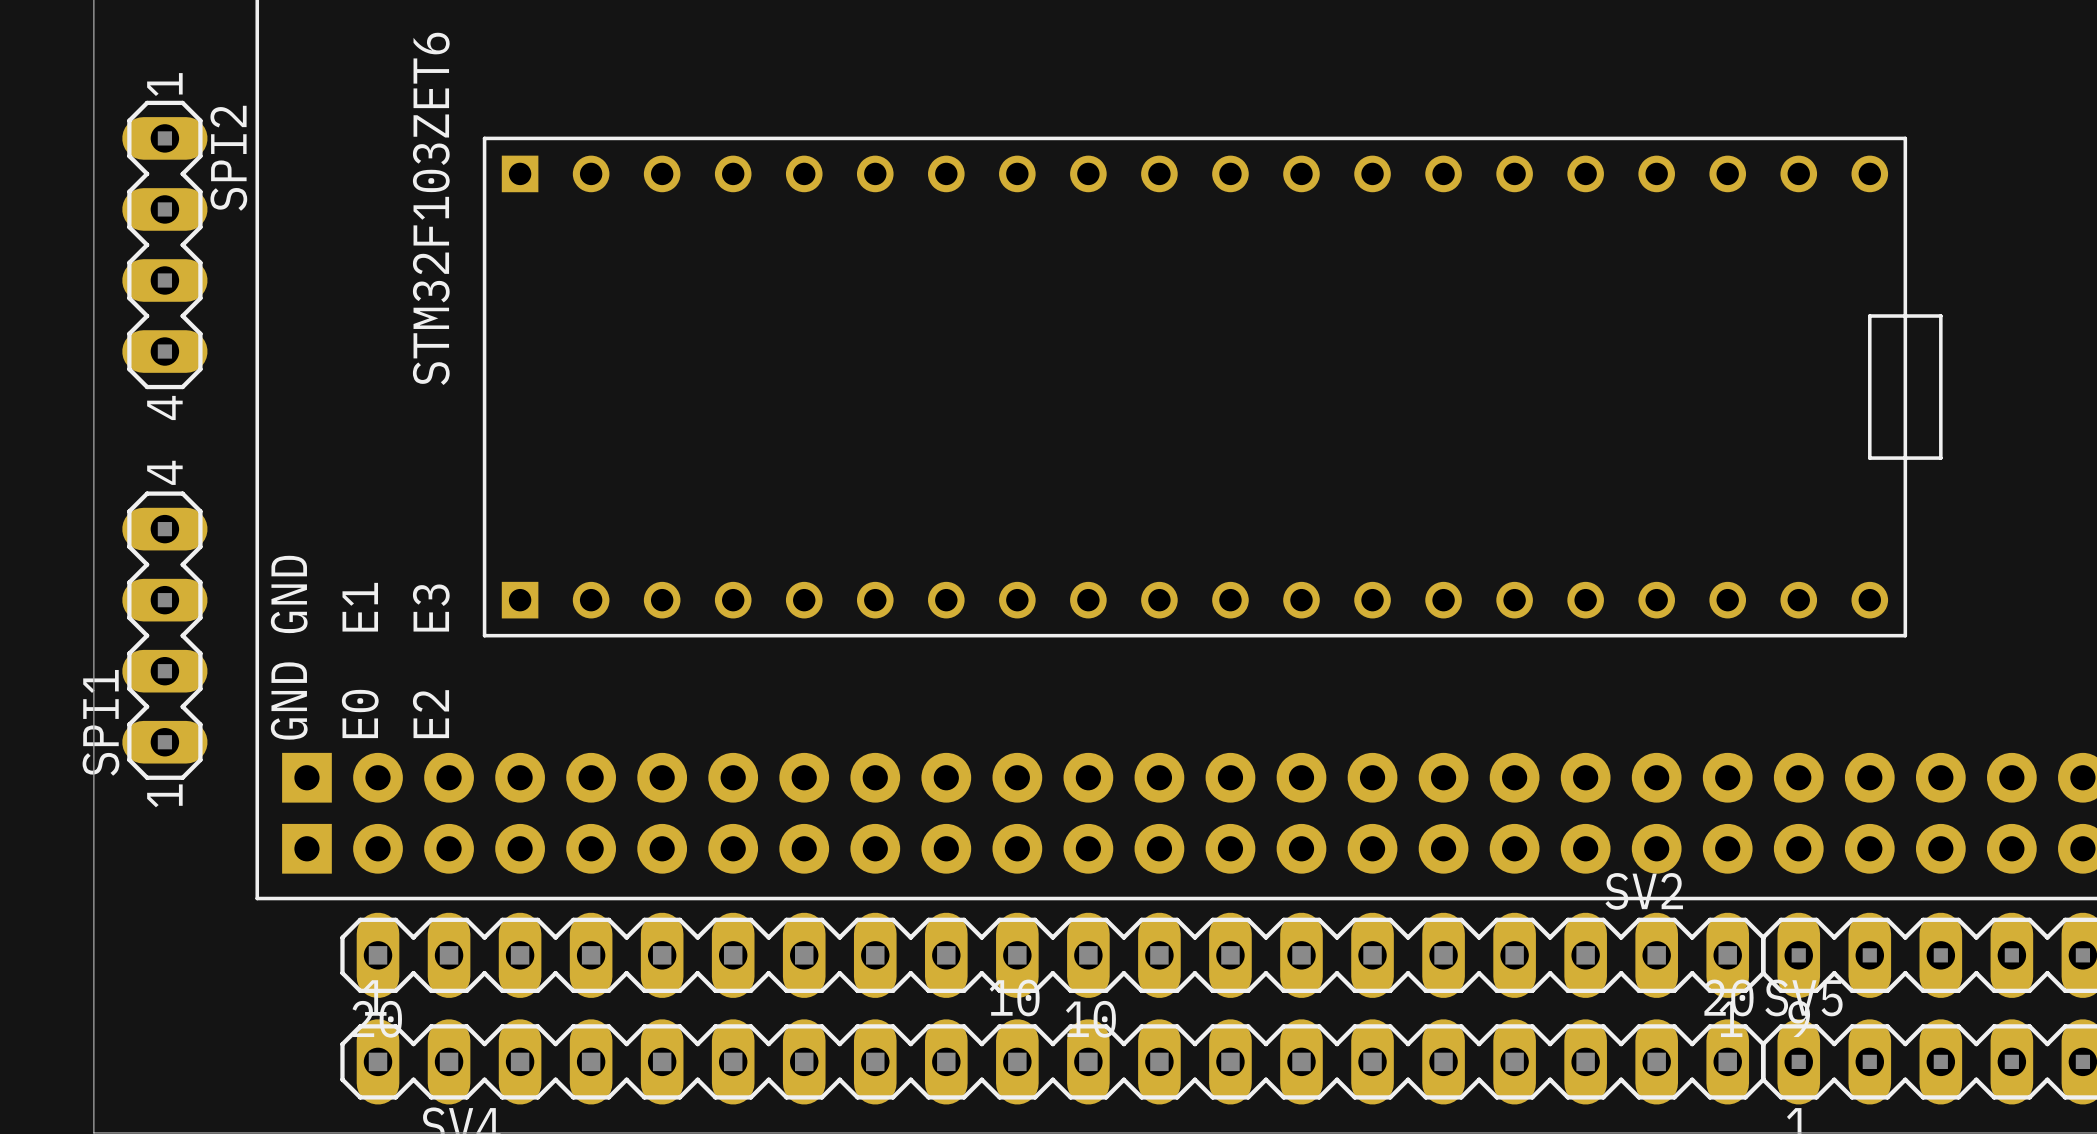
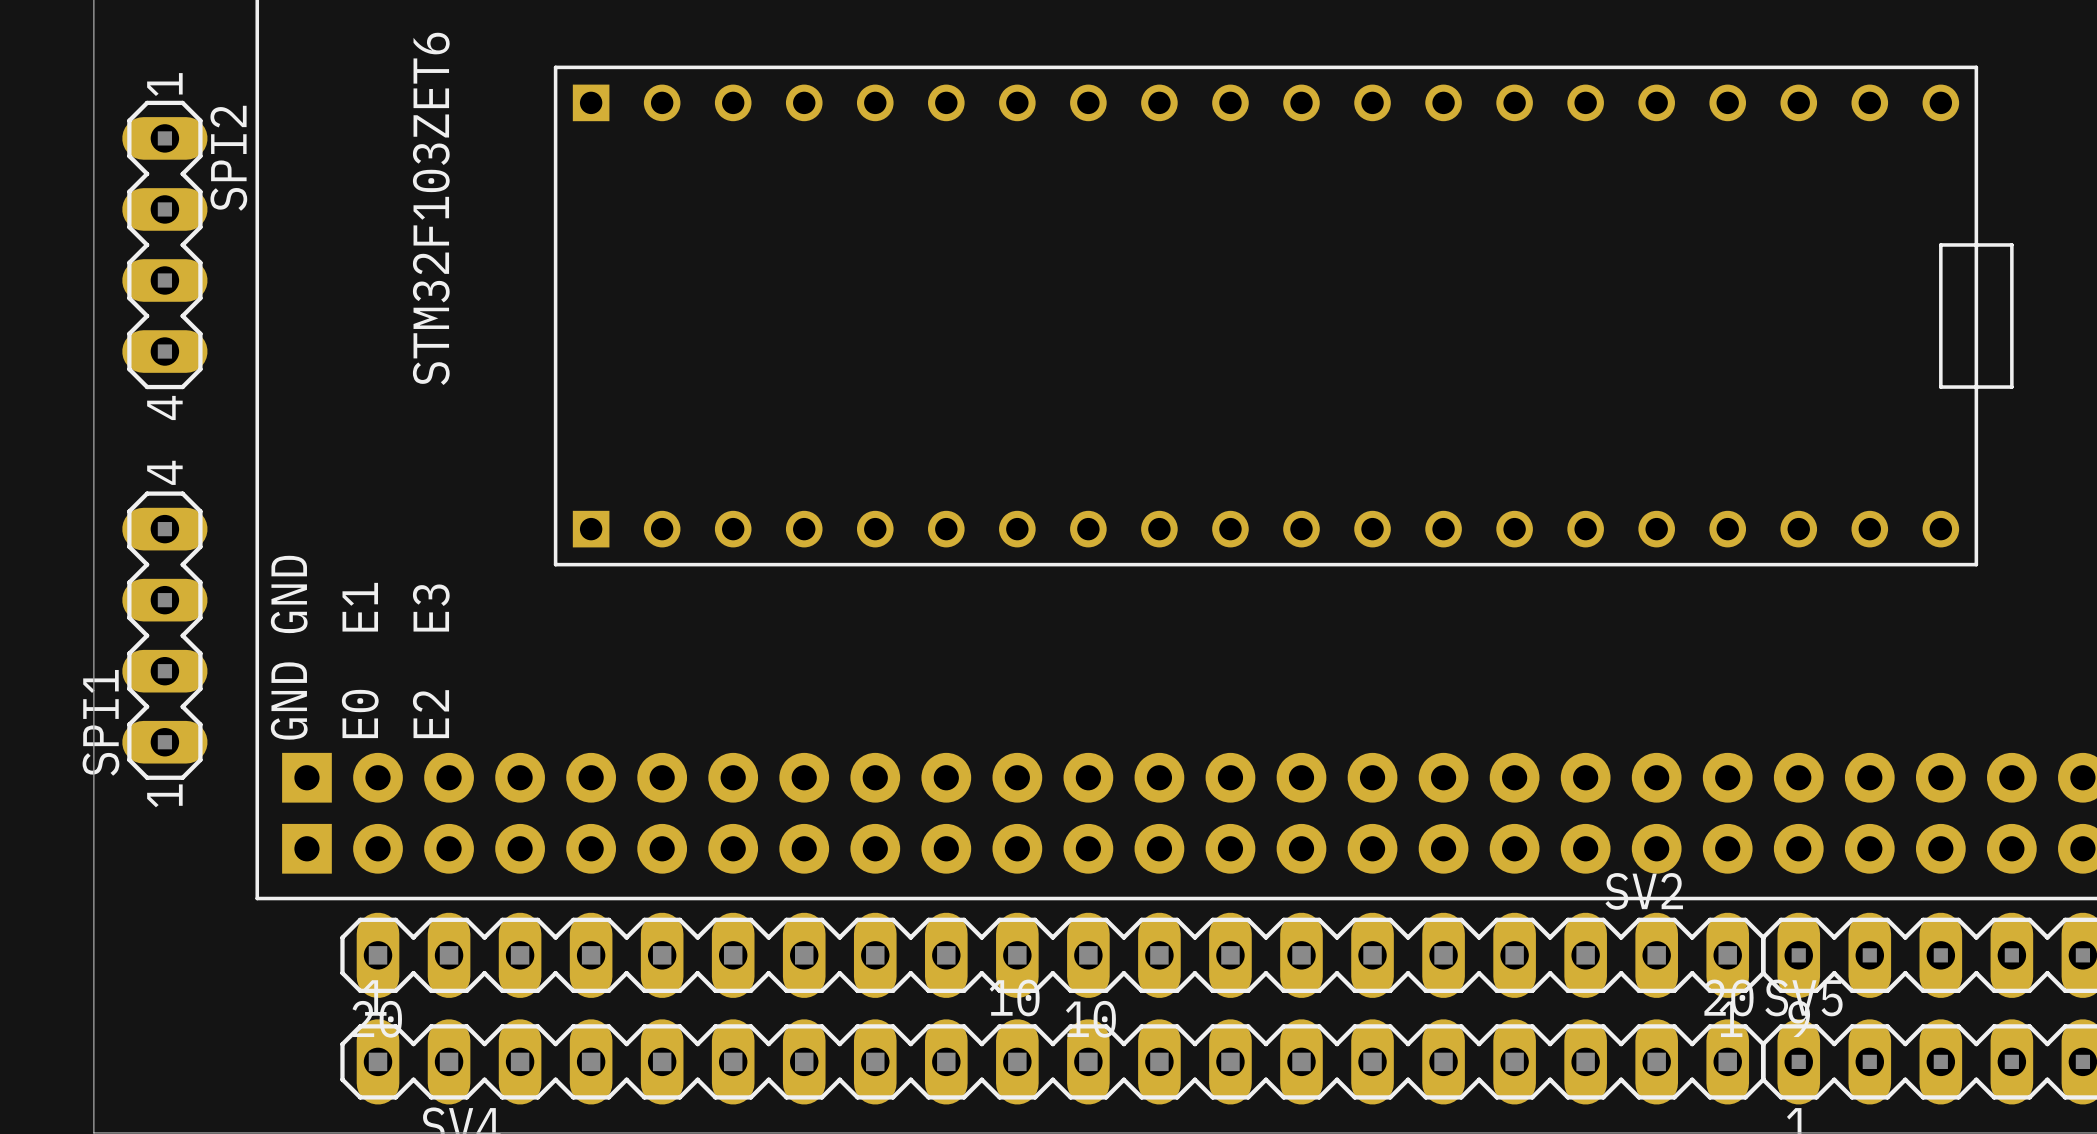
part position: (1212, 387) -> (1283, 316)

